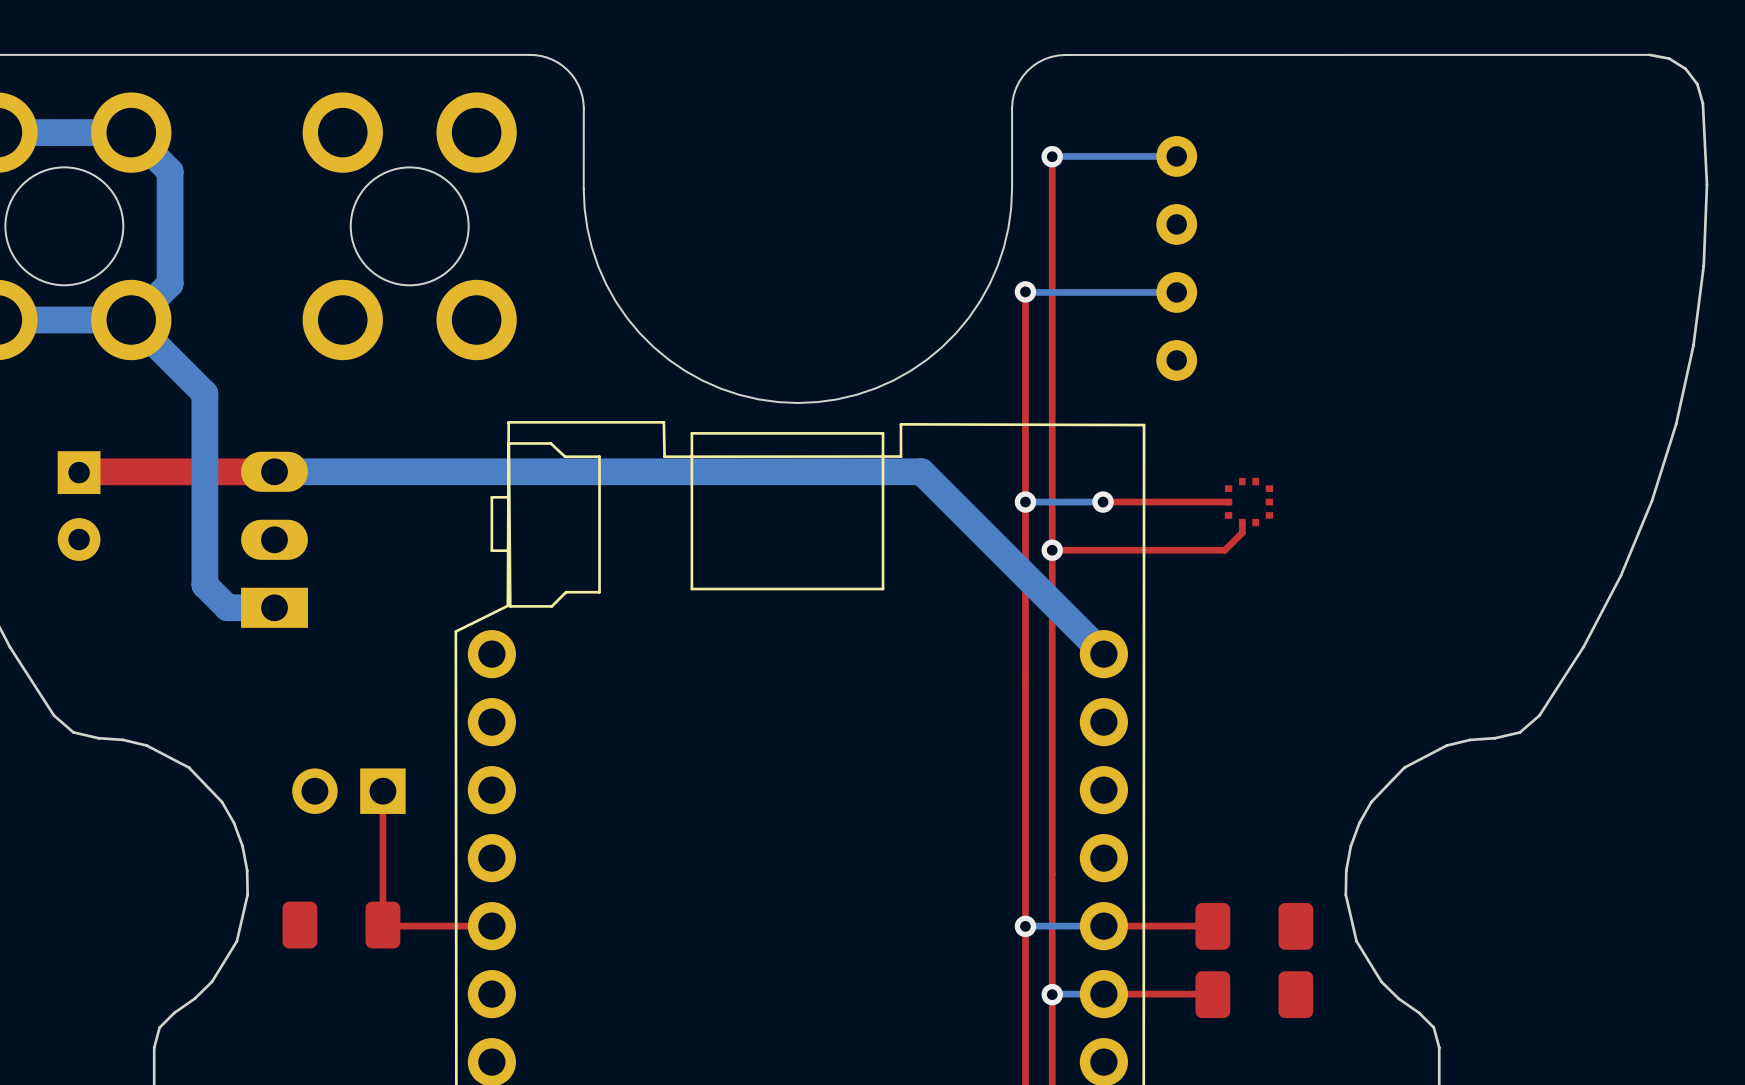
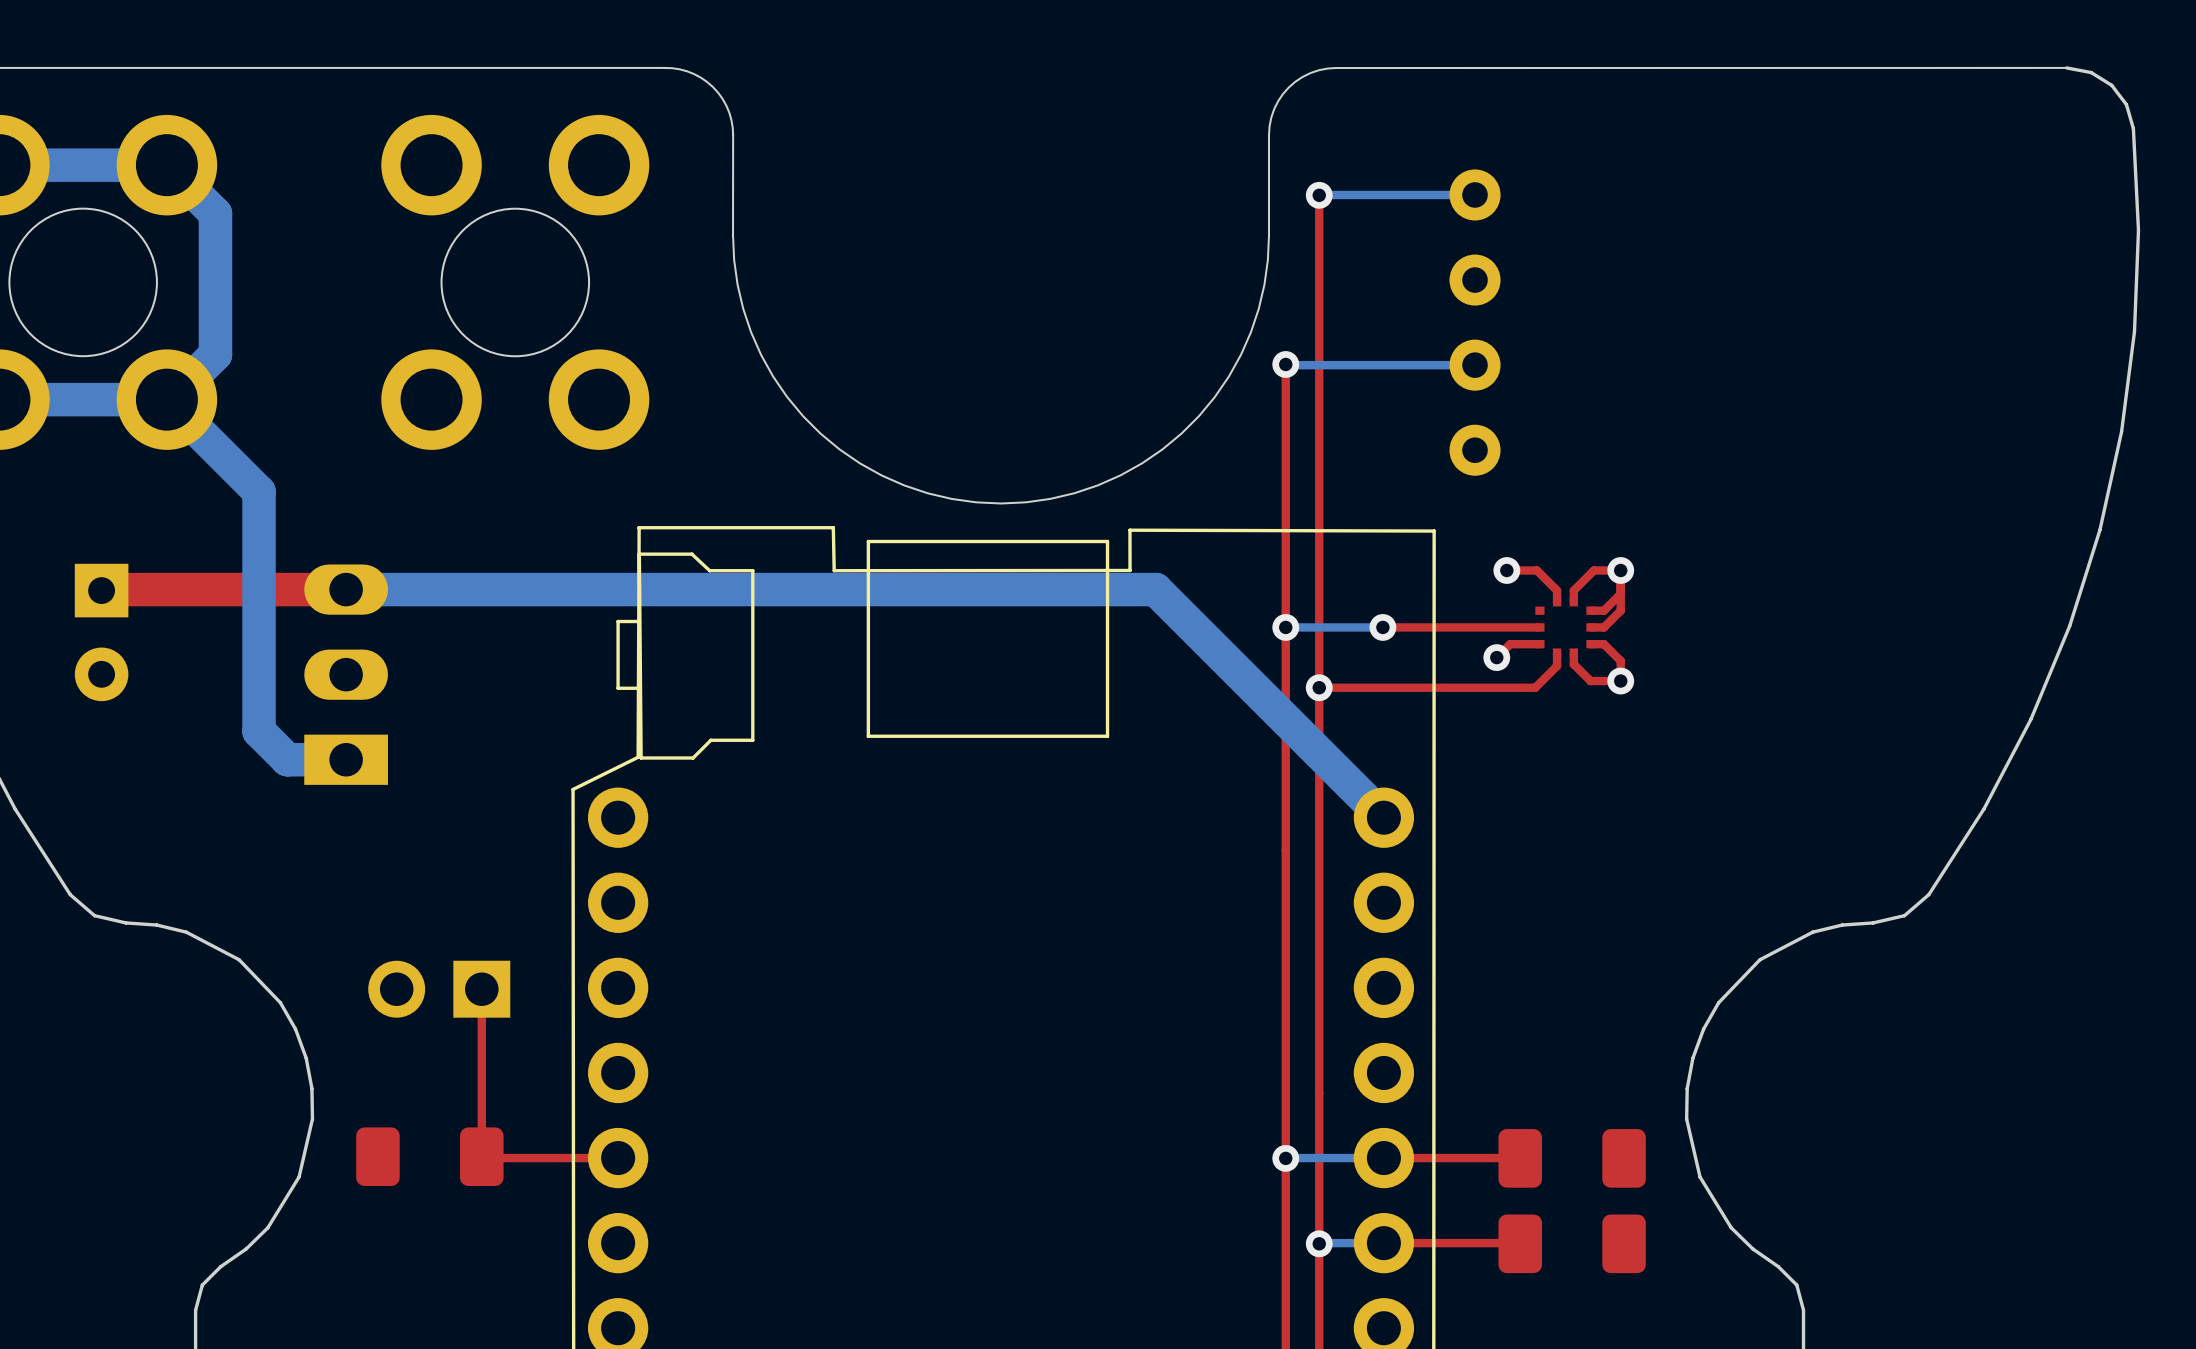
top track: none -> (1506, 570) (1536, 570) (1557, 590) (1557, 601)
via: none -> (1506, 570)
via: none -> (1620, 570)
top track: none -> (1620, 593) (1603, 610) (1591, 610)
top track: none -> (1573, 601) (1573, 590) (1593, 570) (1620, 570) (1620, 610) (1603, 627) (1591, 627)
top track: none -> (1539, 644) (1510, 644) (1496, 657)
top track: none -> (1591, 644) (1603, 644) (1620, 660) (1620, 681) (1590, 681) (1573, 664) (1573, 653)
via: none -> (1496, 657)
via: none -> (1620, 681)

